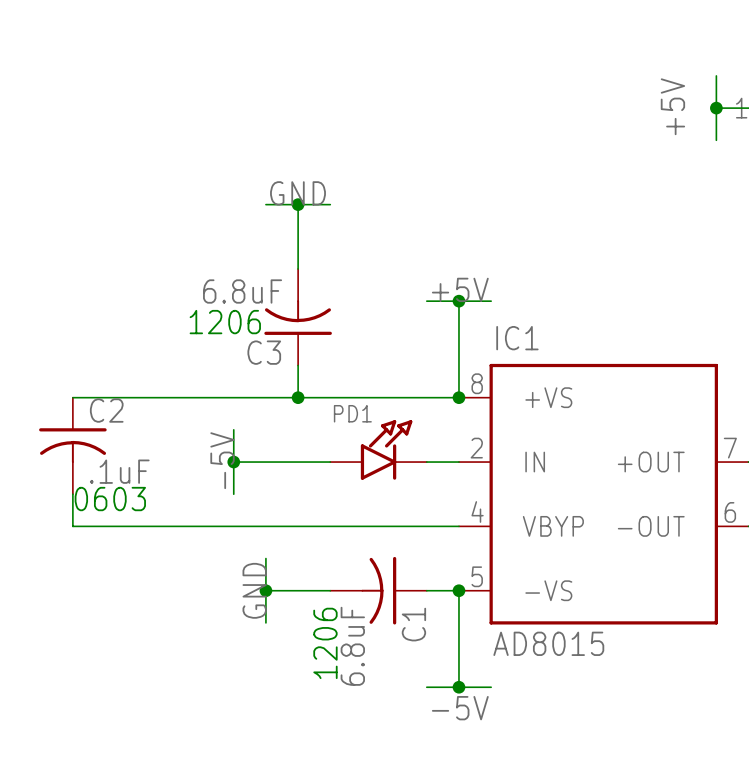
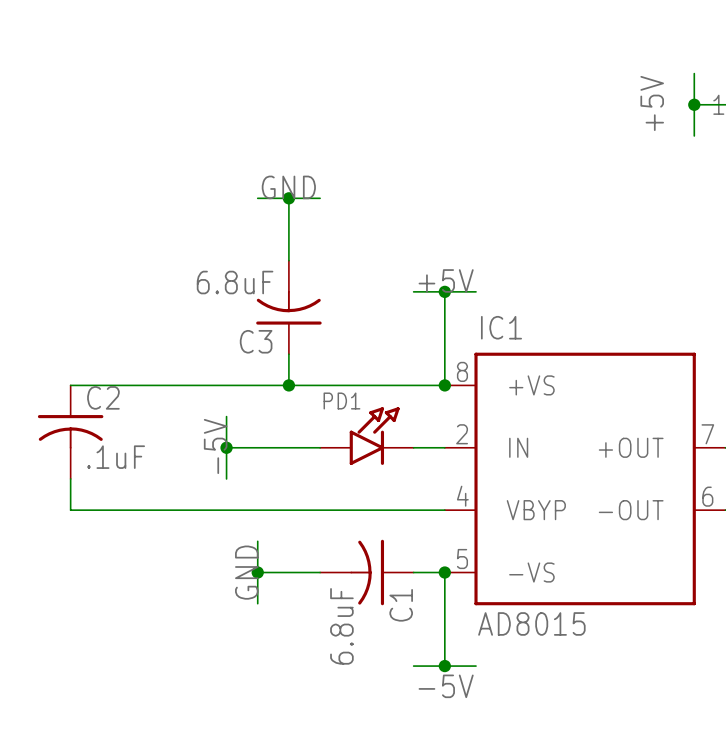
text: 1206 (225, 322) -> none
text: 0603 (110, 499) -> none
text: 1206 (325, 643) -> none

